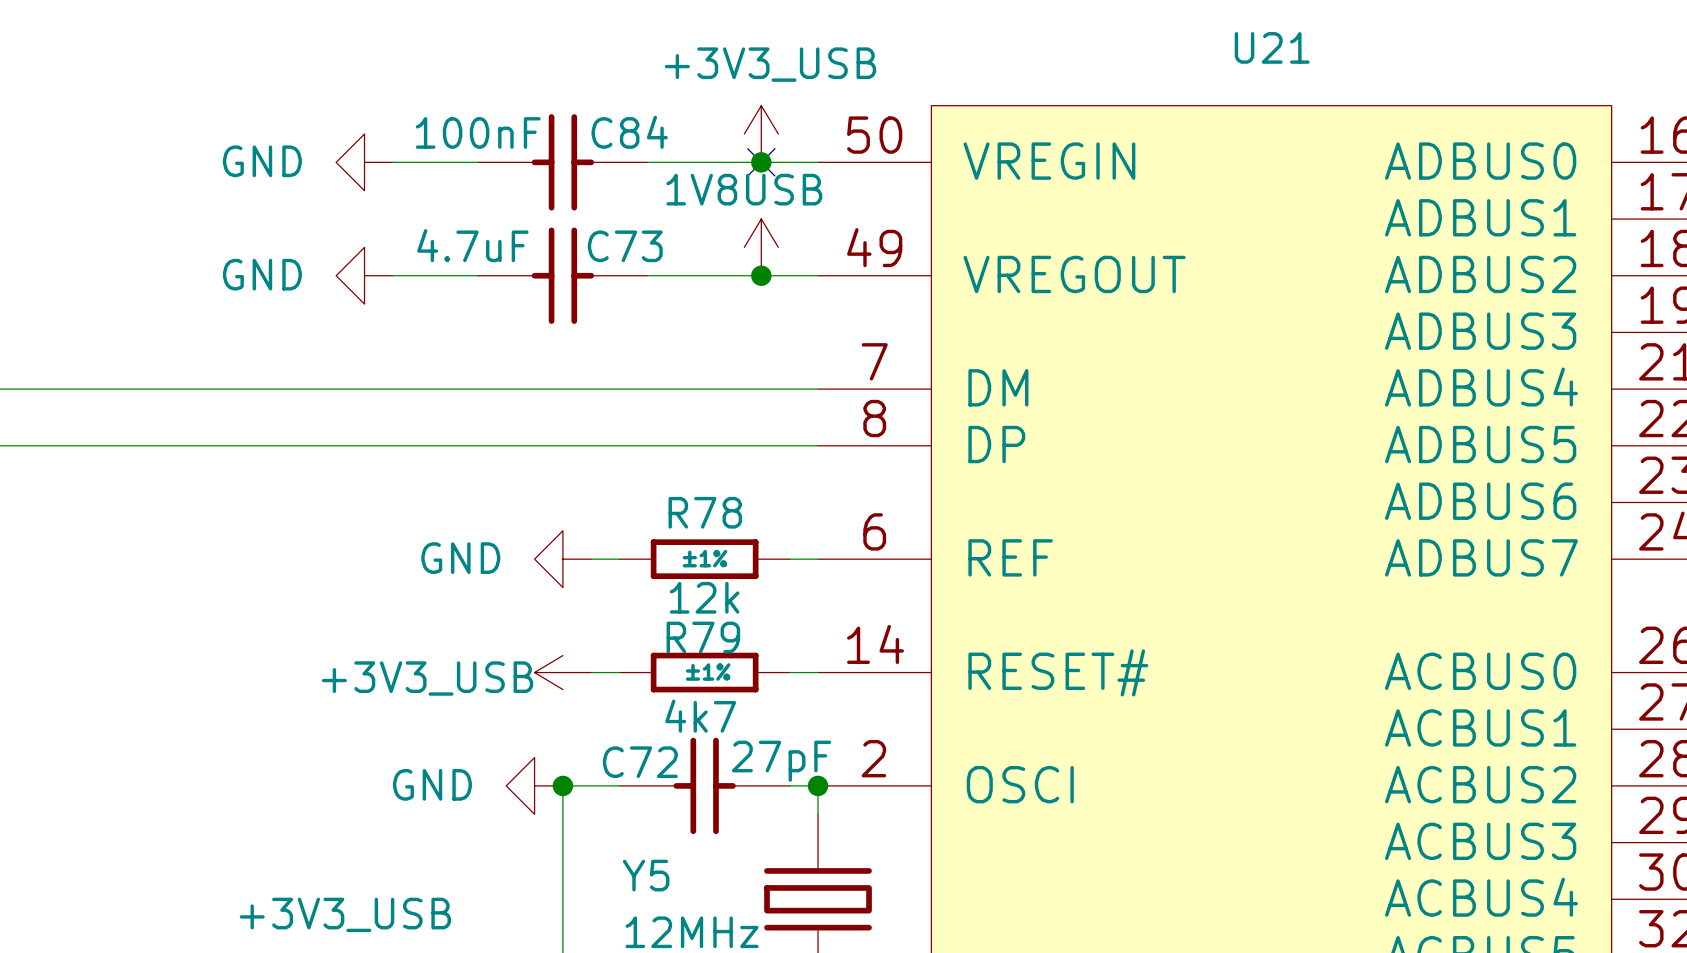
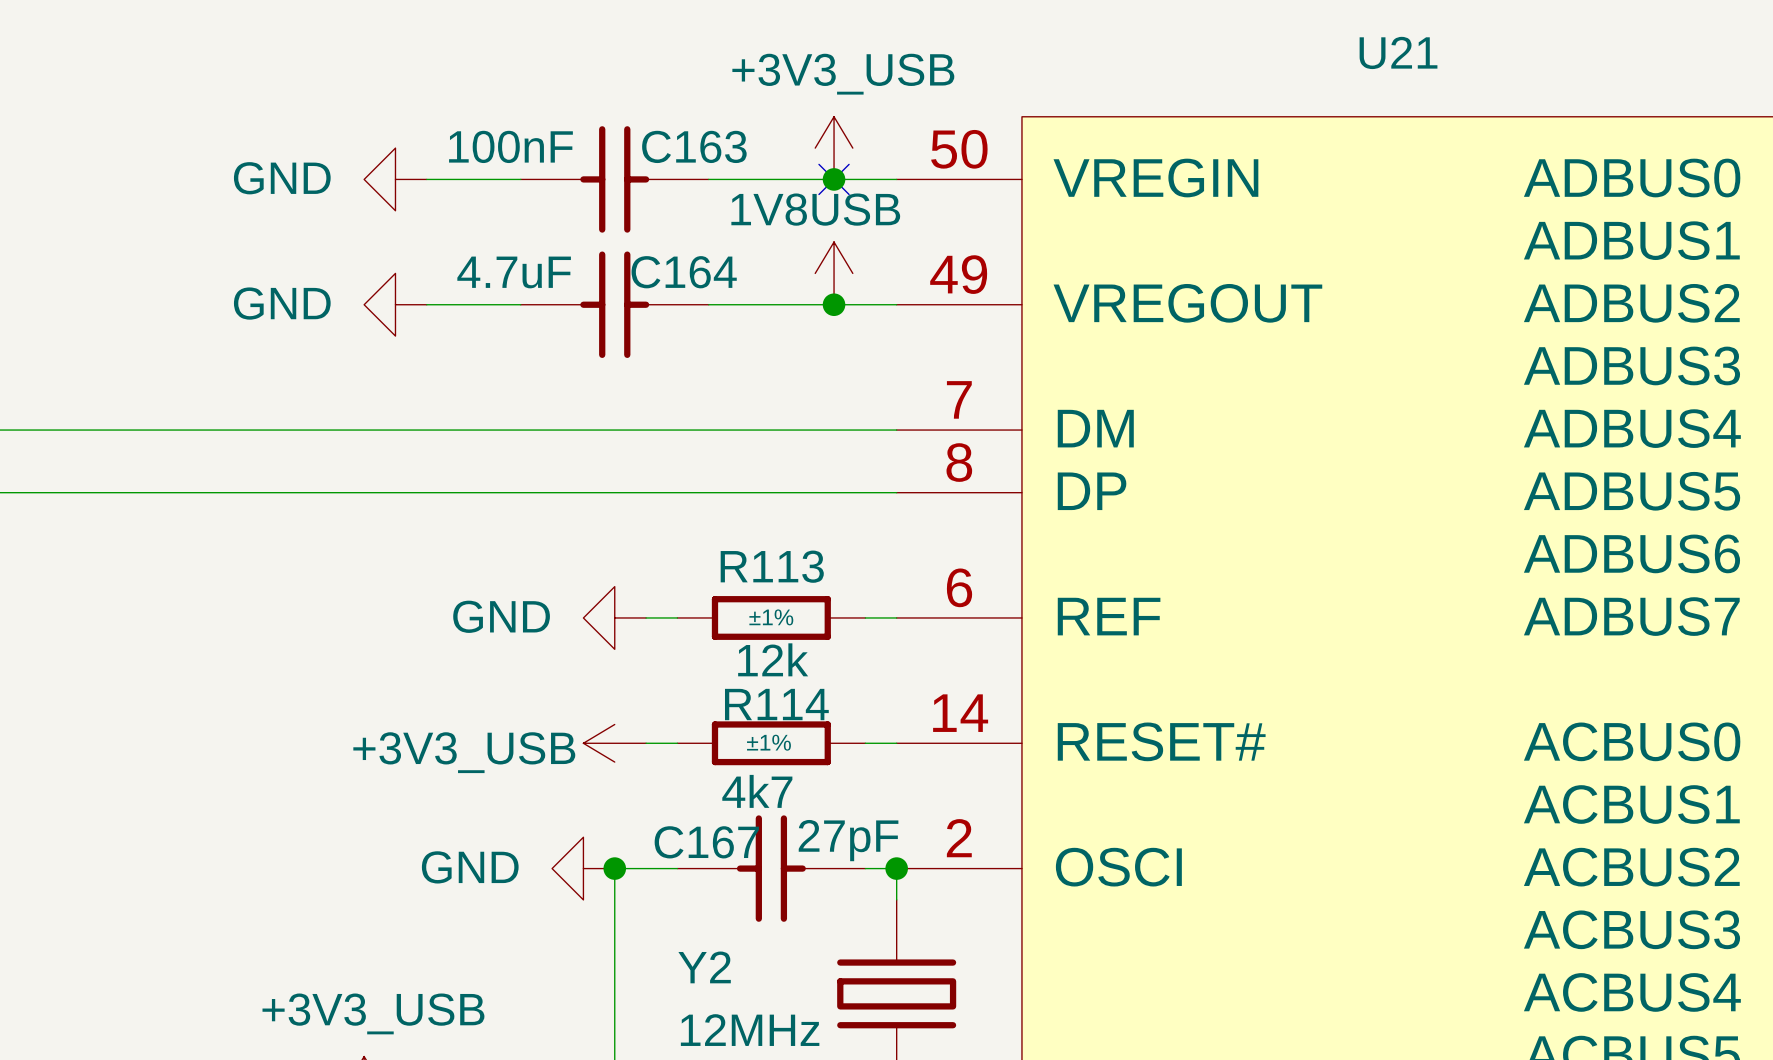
C84 name: C84 (629, 132) -> C163 (694, 146)
C73 name: C73 (625, 246) -> C164 (684, 272)
R78 name: R78 (705, 512) -> R113 (772, 566)
R79 name: R79 (703, 637) -> R114 (776, 704)
C72 name: C72 (640, 762) -> C167 (706, 842)
Y5 name: Y5 (646, 875) -> Y2 (704, 967)

